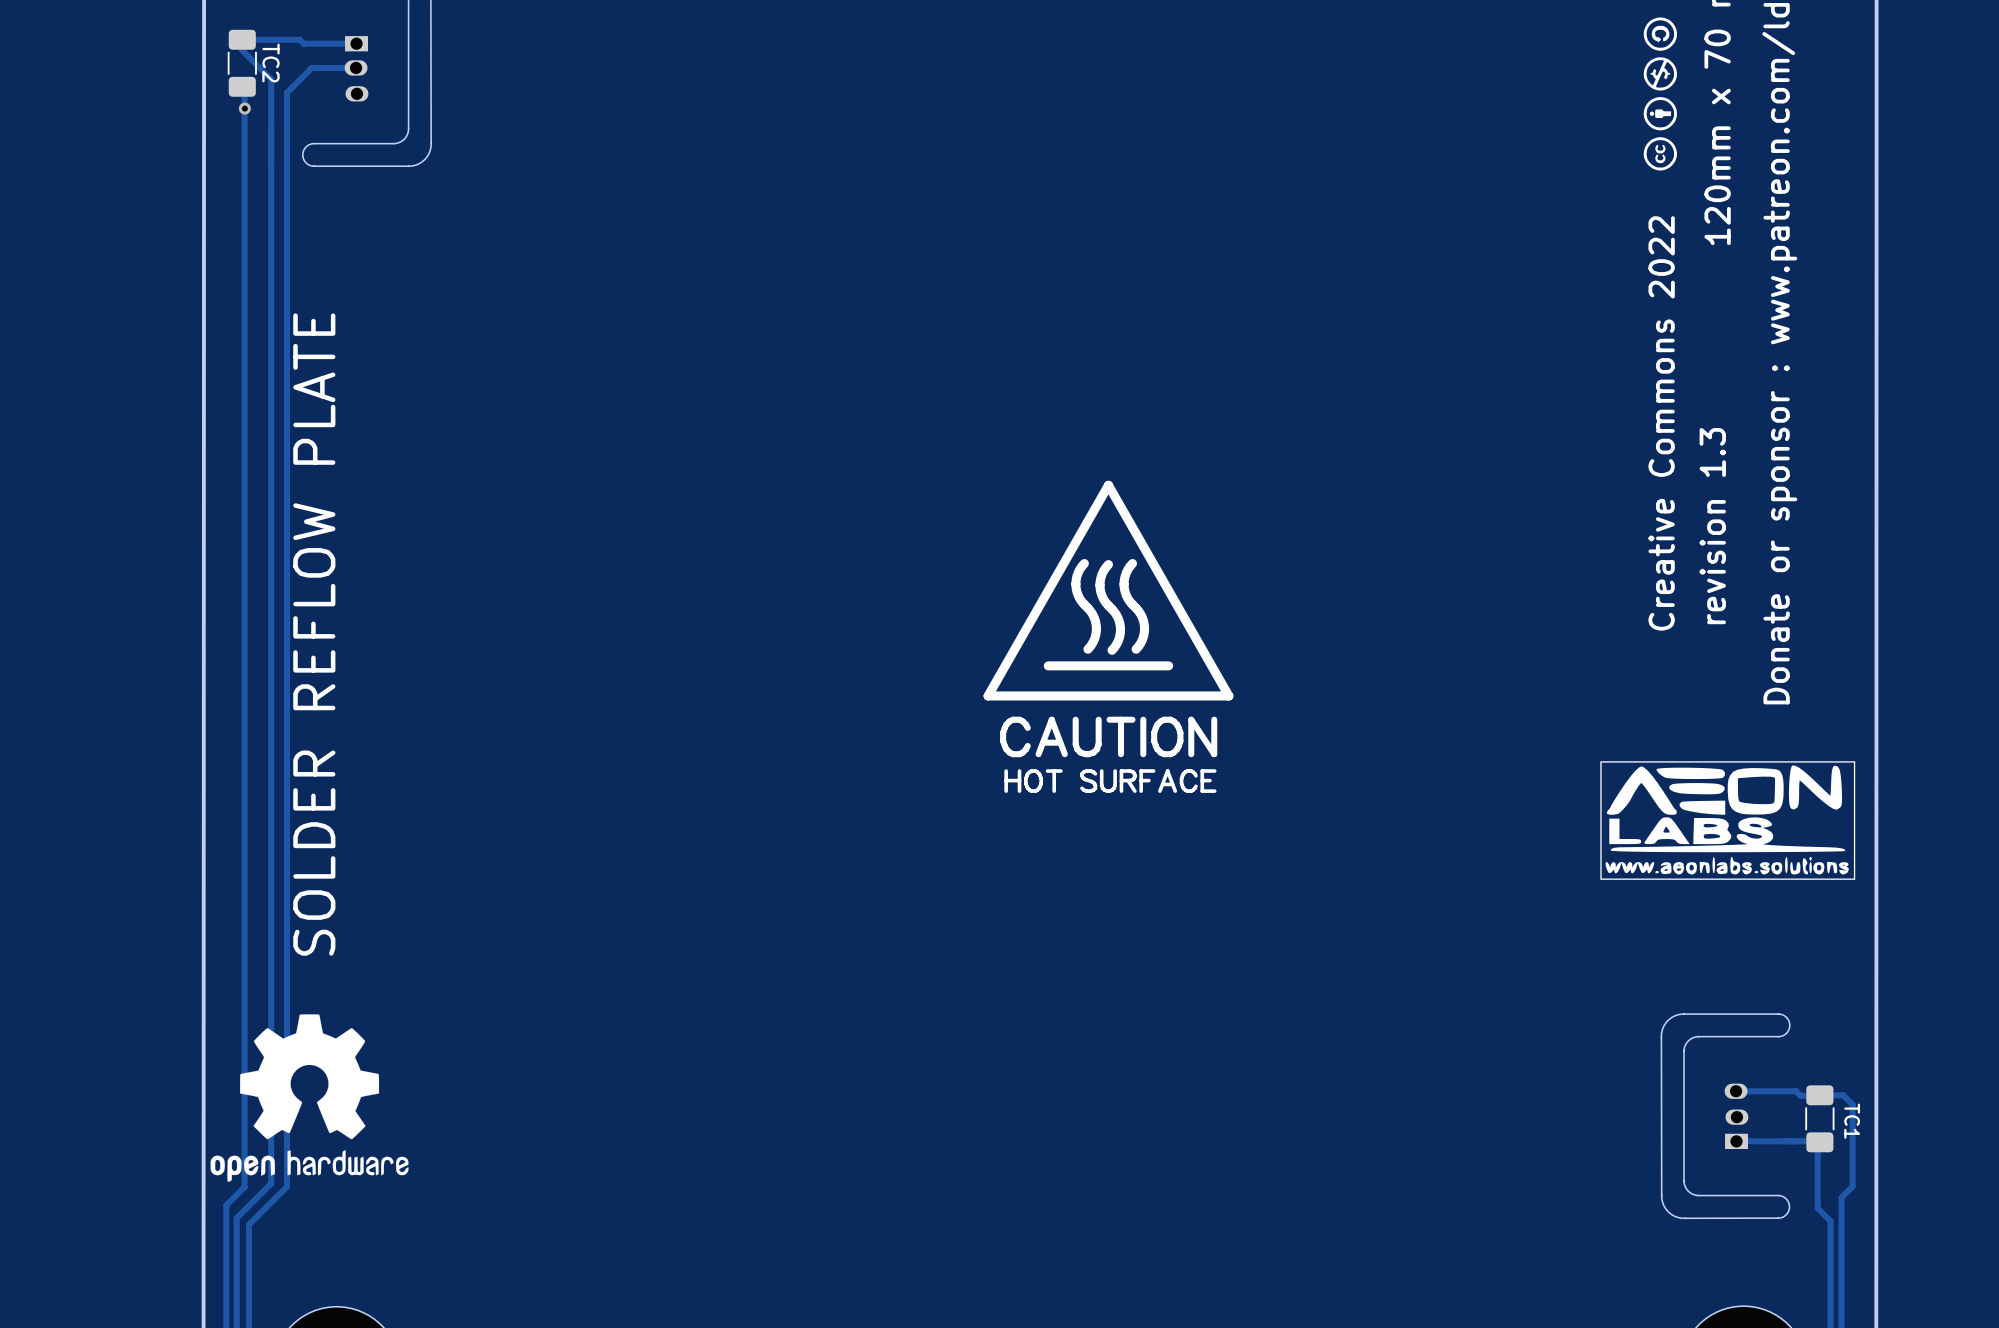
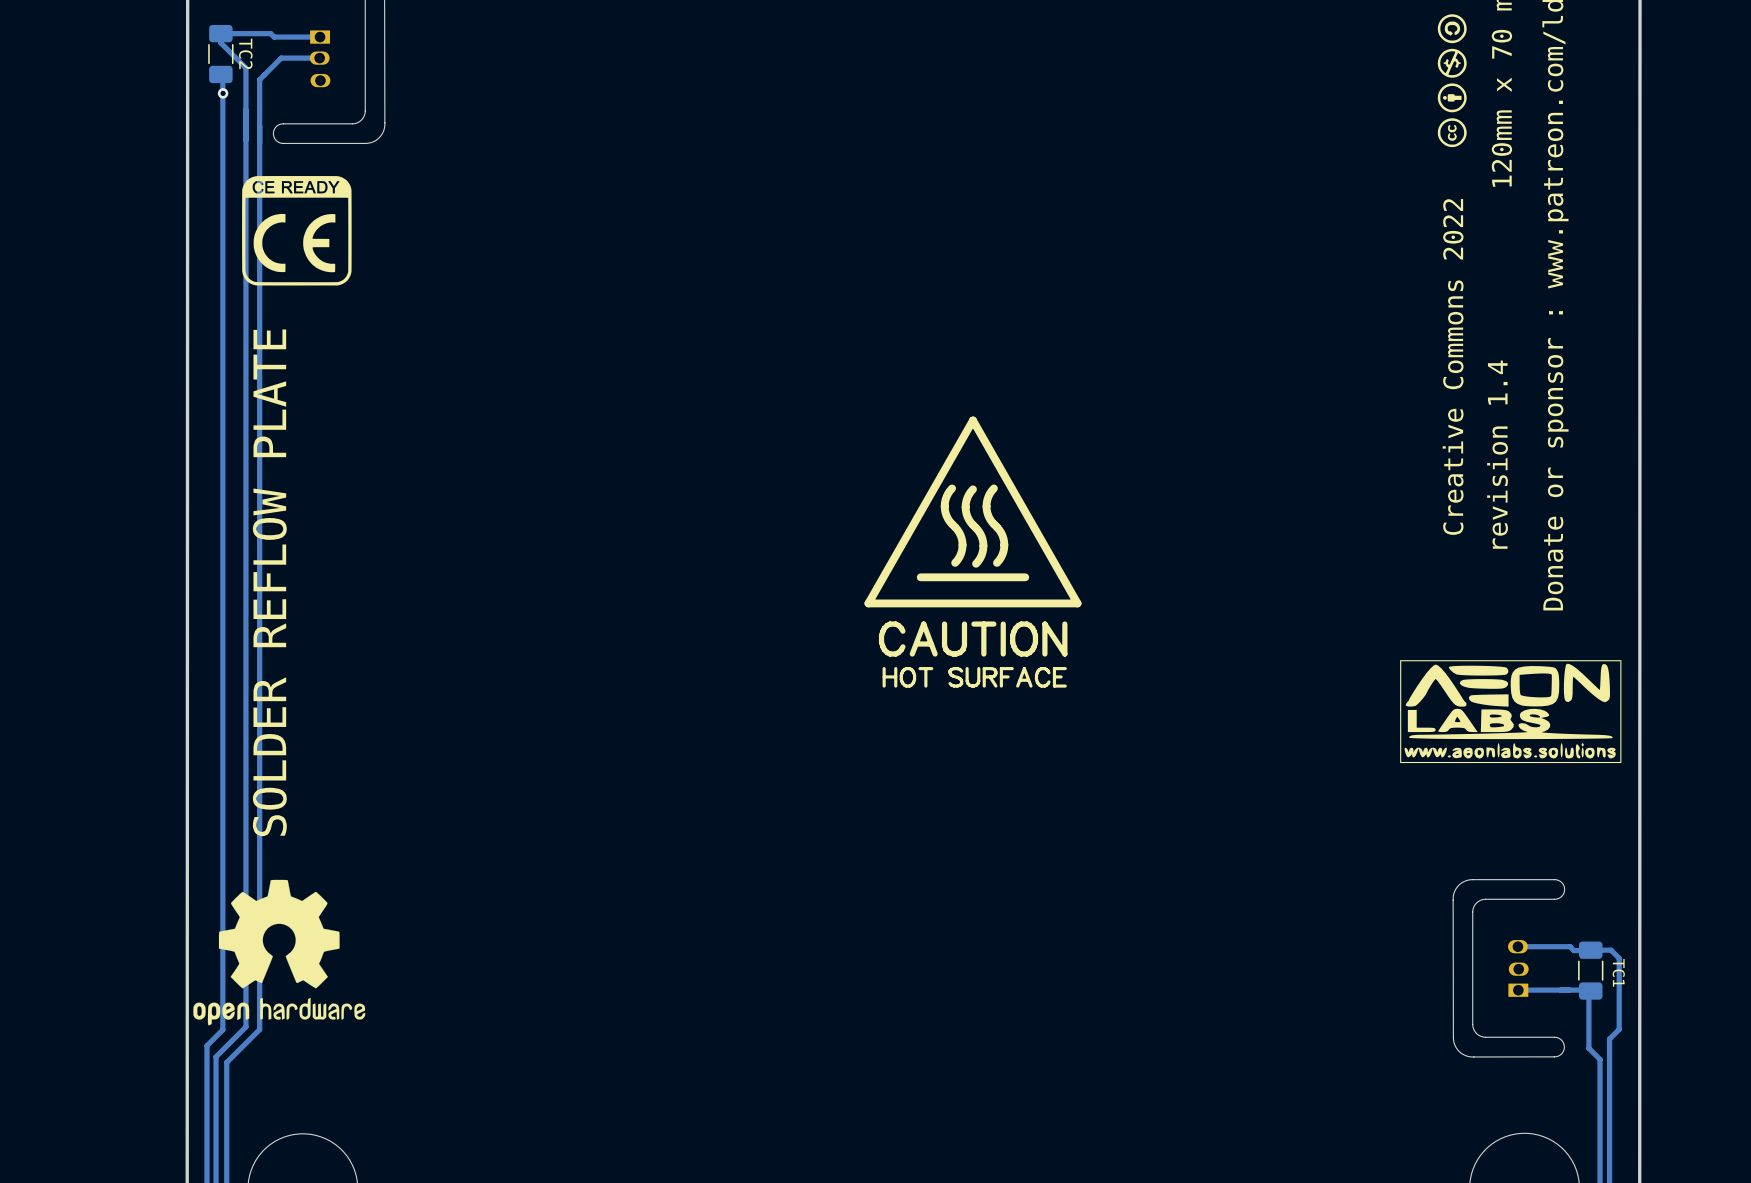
drawing: none -> [242, 176, 352, 286]
text: revision 1.3 (1712, 526) -> revision 1.4 (1497, 454)
text position: SOLDER REFLOW PLATE (314, 634) -> SOLDER REFLOW PLATE (269, 582)

